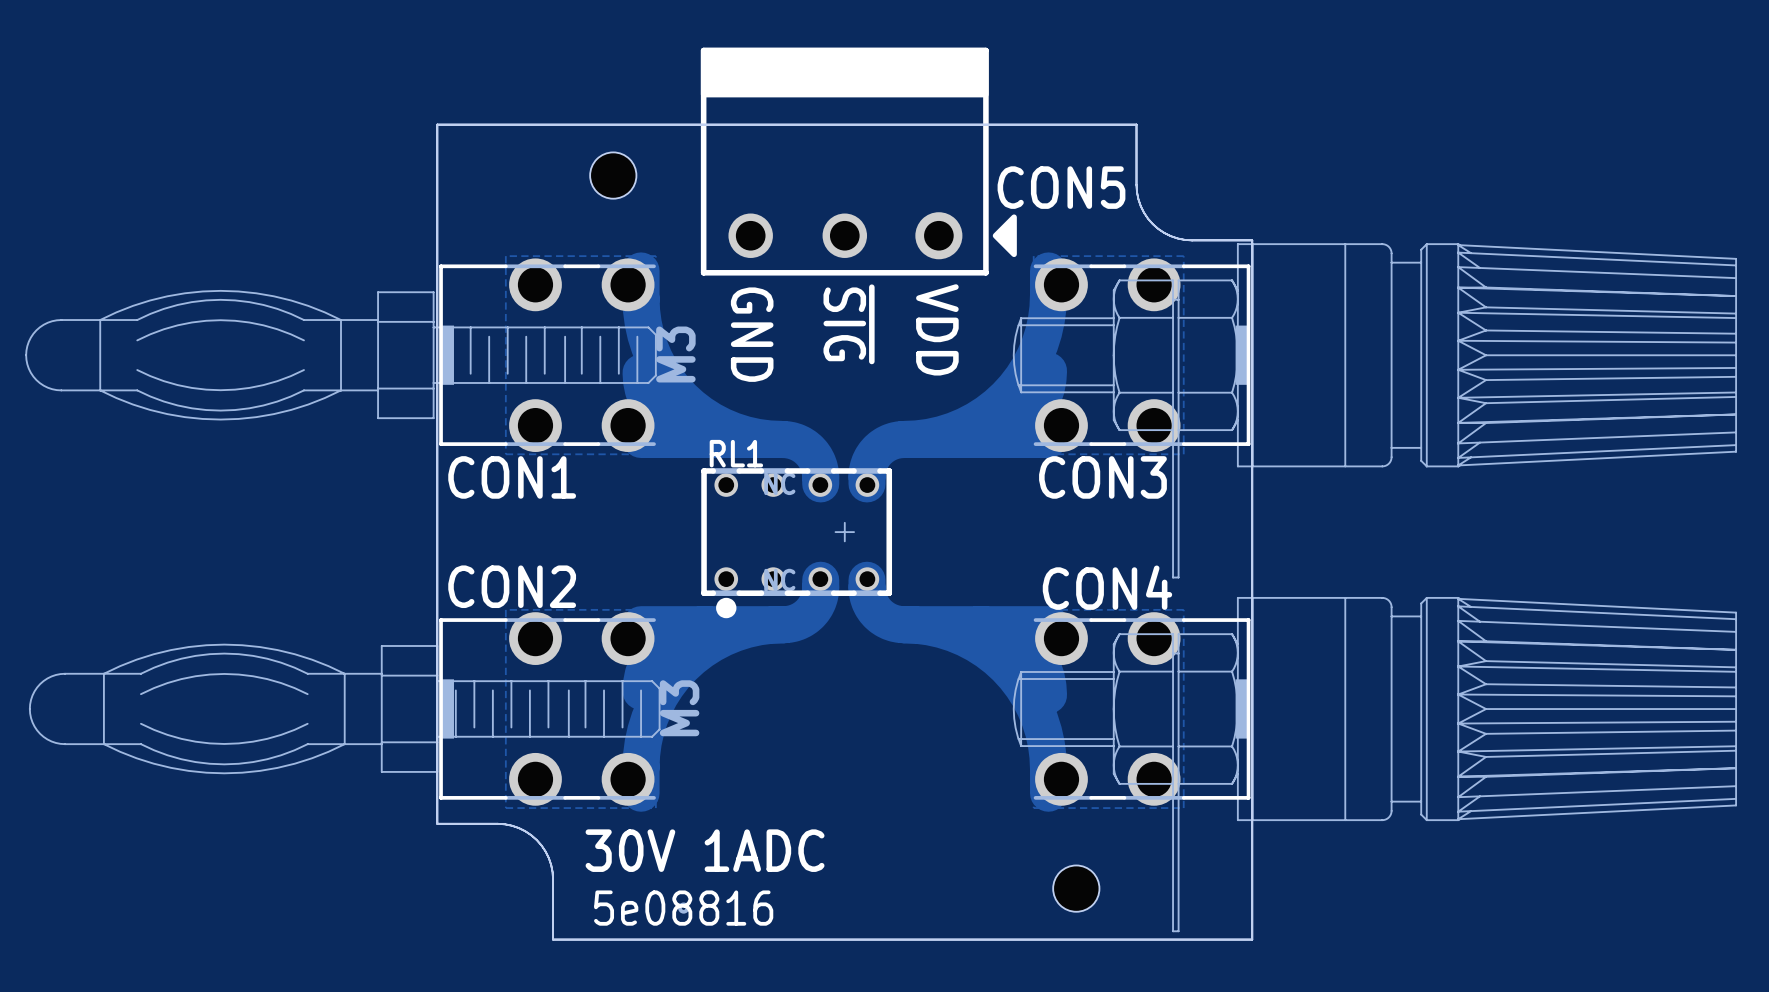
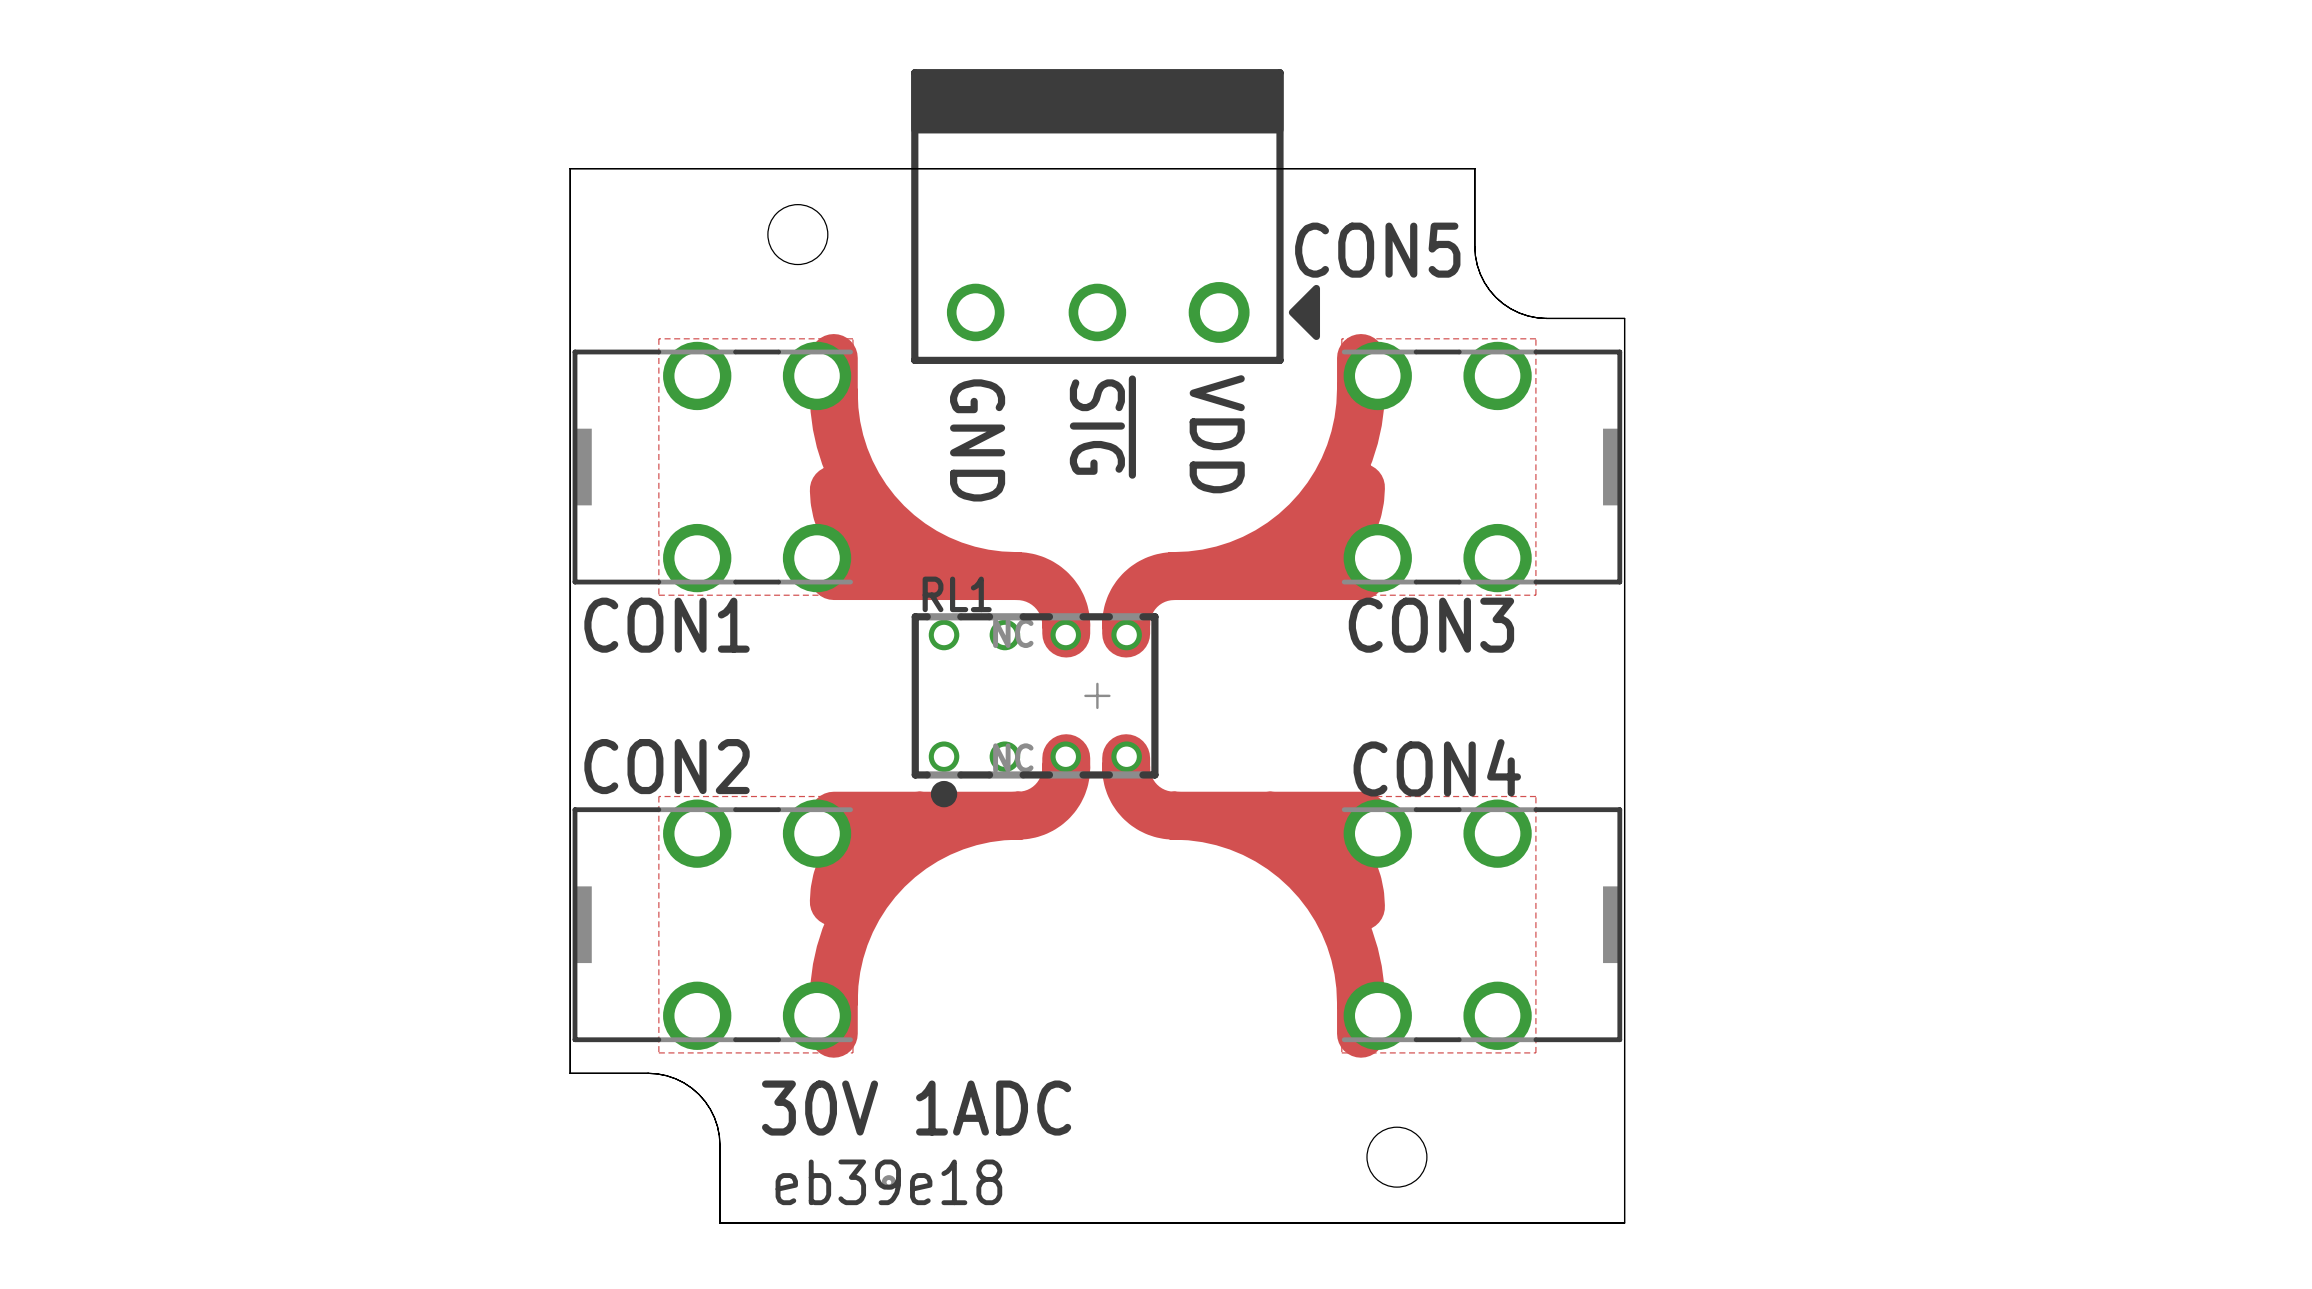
drawing: [1012, 243, 1738, 933] -> none
drawing: [25, 289, 657, 421] -> none
drawing: [28, 643, 661, 775] -> none
drawing shape: [594, 890, 774, 926] -> [775, 1159, 1003, 1206]

